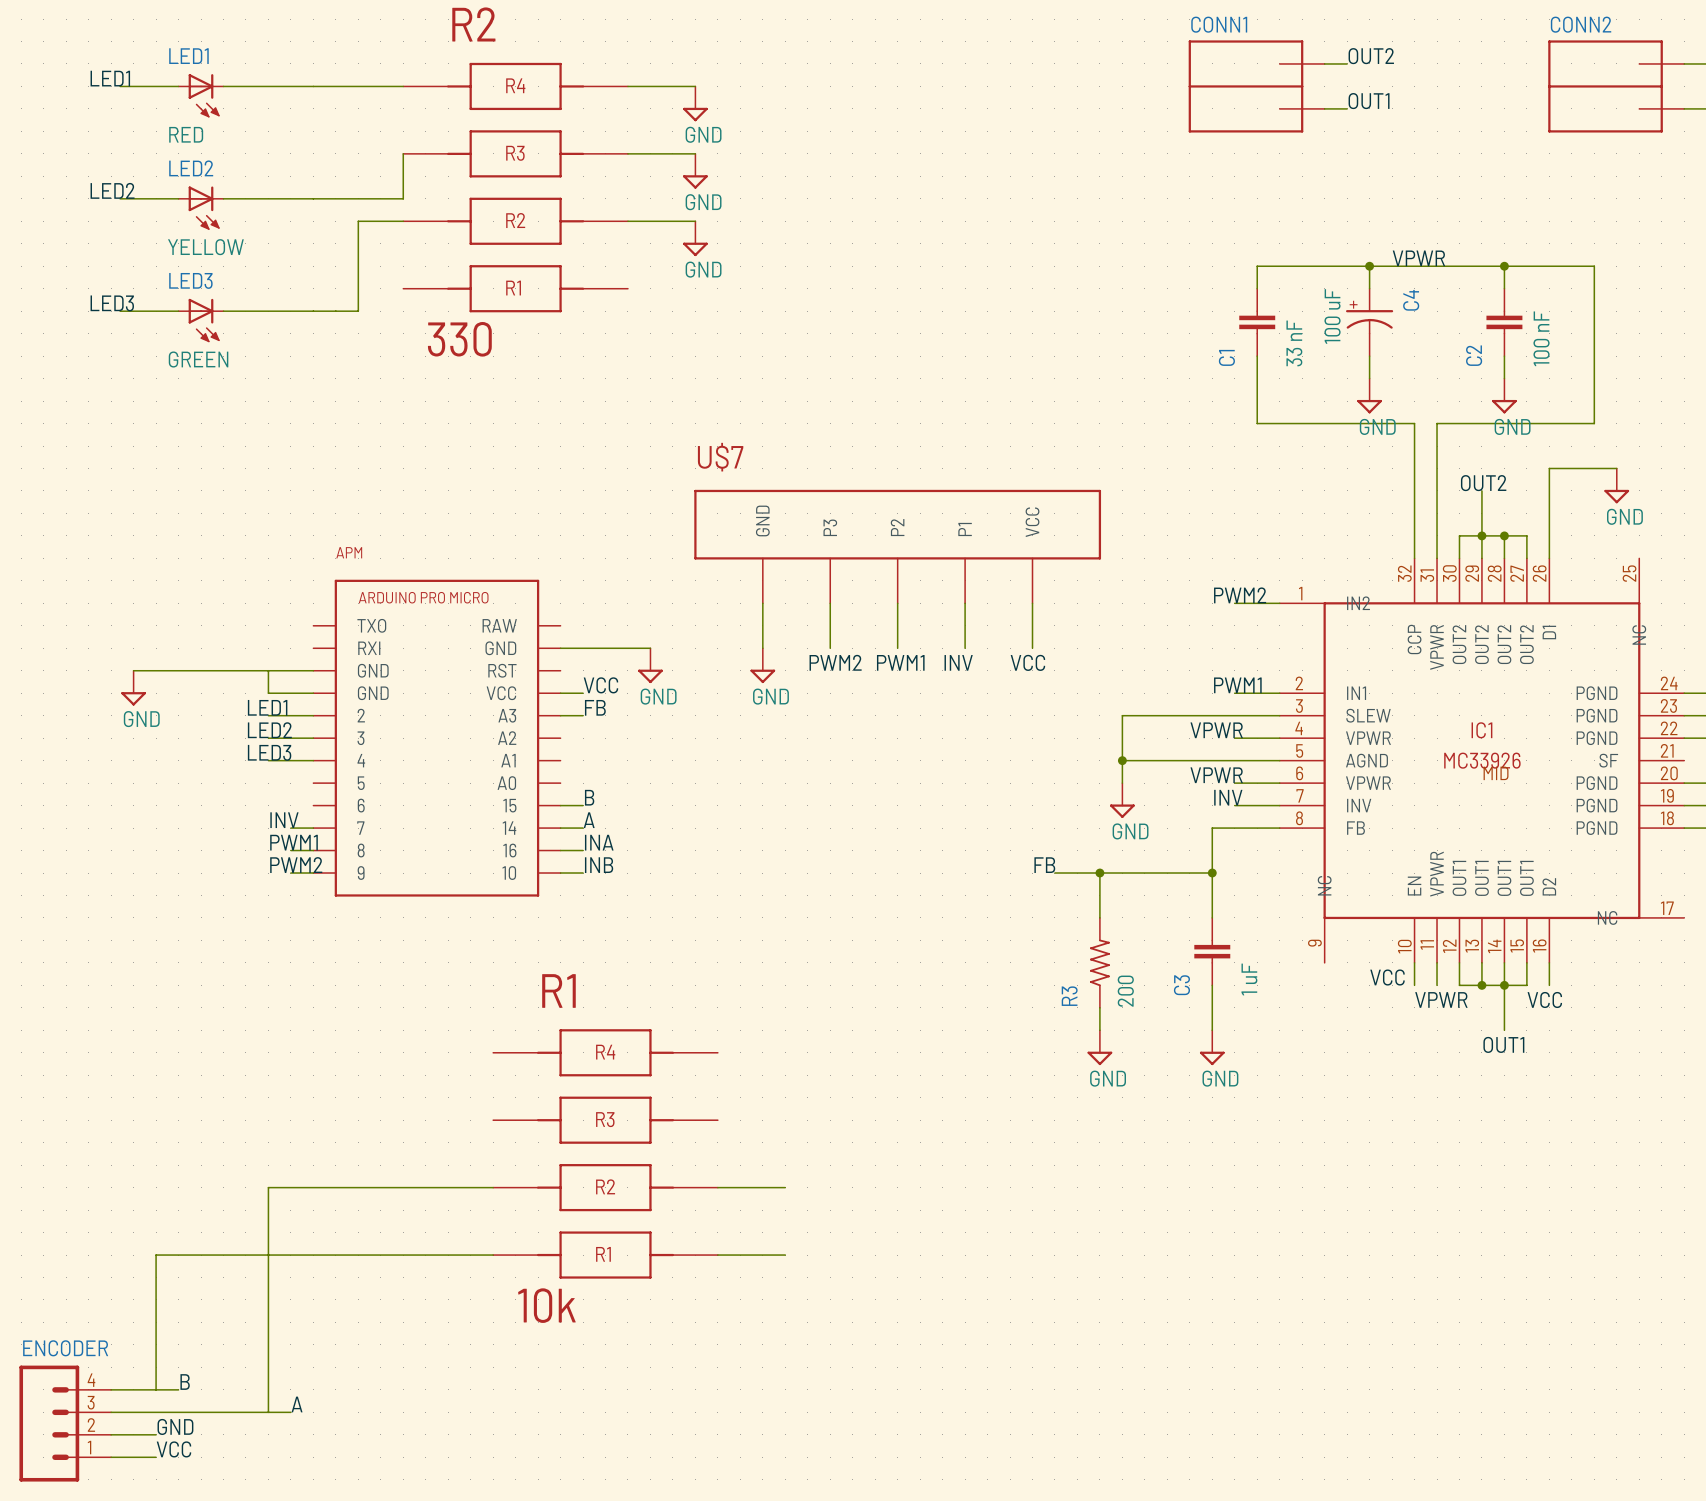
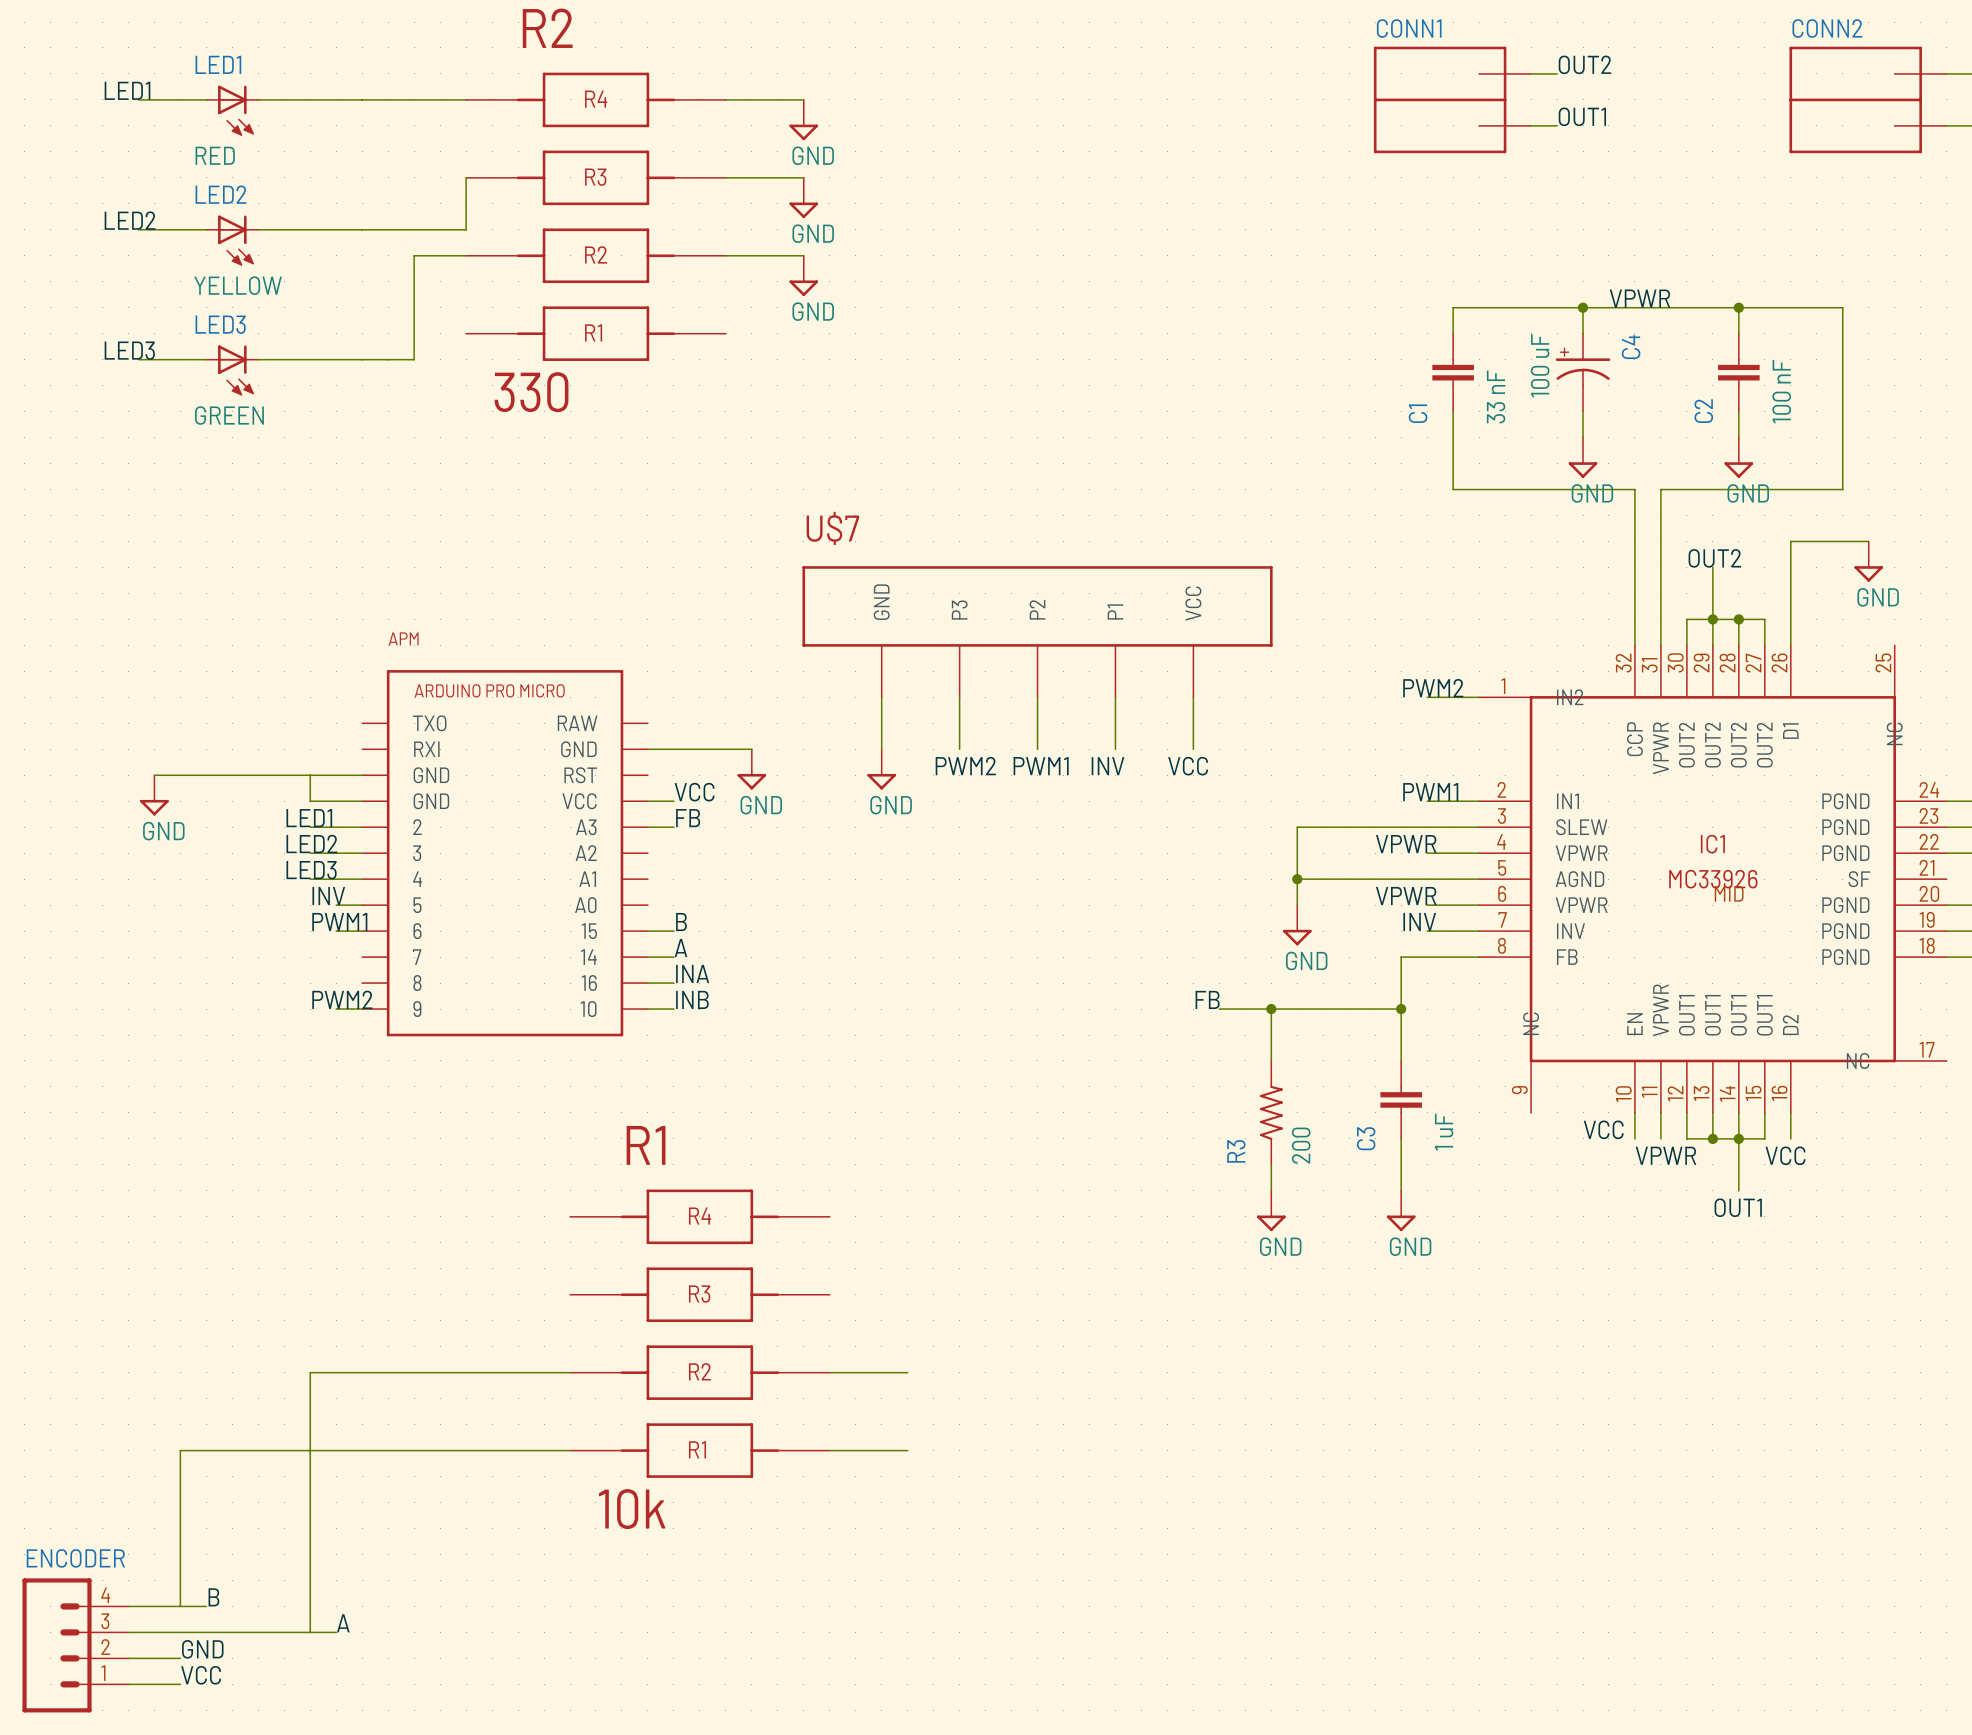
label position: INV (284, 820) -> INV (328, 896)
wire: (290, 828) (313, 828) -> (336, 905) (362, 905)
label position: PWM1 (294, 842) -> PWM1 (339, 922)
wire: (290, 850) (313, 850) -> (336, 931) (362, 931)

